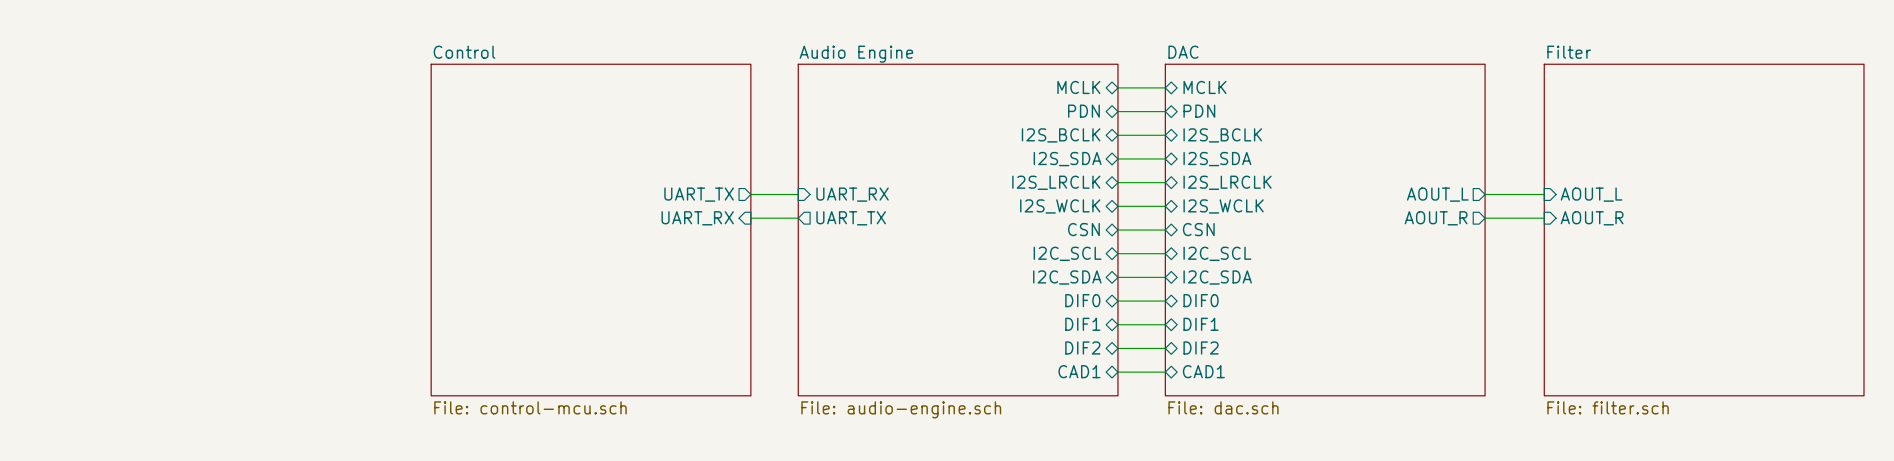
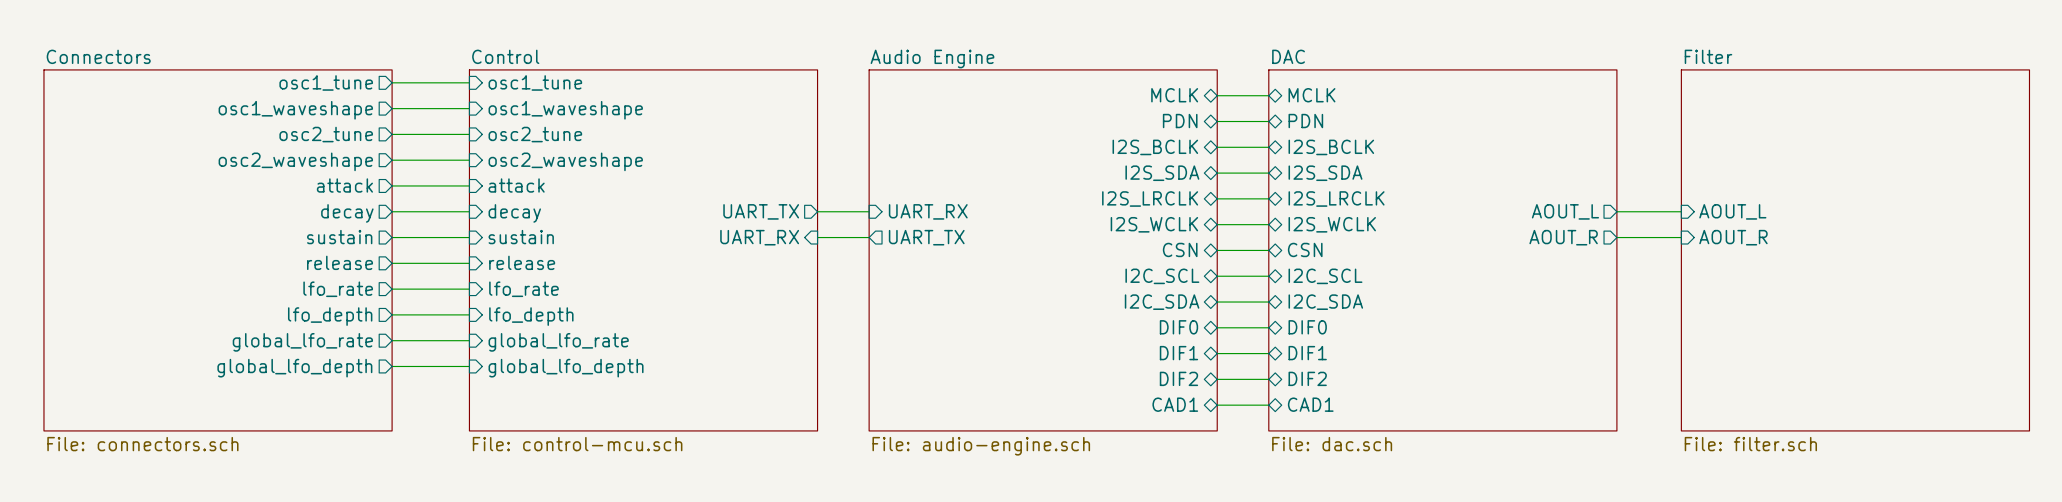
sheet pin: none -> osc1_tune (326, 82)
wire: none -> (392, 82) (469, 82)
sheet pin: none -> osc1_tune (535, 82)
wire: none -> (392, 108) (469, 108)
sheet pin: none -> osc1_waveshape (295, 110)
sheet pin: none -> osc1_waveshape (565, 110)
sheet pin: none -> osc2_tune (326, 134)
wire: none -> (392, 134) (469, 134)
sheet pin: none -> osc2_tune (535, 134)
wire: none -> (392, 160) (469, 160)
sheet pin: none -> osc2_waveshape (295, 161)
sheet pin: none -> osc2_waveshape (565, 161)
sheet pin: none -> attack (344, 185)
wire: none -> (392, 185) (469, 185)
sheet pin: none -> attack (516, 185)
wire: none -> (392, 211) (469, 211)
sheet pin: none -> decay (347, 213)
sheet pin: none -> decay (514, 213)
sheet pin: none -> sustain (339, 237)
sheet pin: none -> sustain (521, 237)
wire: none -> (392, 237) (469, 237)
sheet Connectors: none -> File: connectors.sch (218, 250)
sheet pin: none -> release (340, 262)
wire: none -> (392, 263) (469, 263)
sheet pin: none -> release (522, 262)
sheet pin: none -> lfo_rate (338, 289)
wire: none -> (392, 289) (469, 289)
sheet pin: none -> lfo_rate (523, 289)
wire: none -> (392, 314) (469, 314)
sheet pin: none -> lfo_depth (330, 316)
sheet pin: none -> lfo_depth (531, 316)
wire: none -> (392, 340) (469, 340)
sheet pin: none -> global_lfo_rate (302, 342)
sheet pin: none -> global_lfo_rate (558, 342)
wire: none -> (392, 366) (469, 366)
sheet pin: none -> global_lfo_depth (294, 368)
sheet pin: none -> global_lfo_depth (566, 368)

